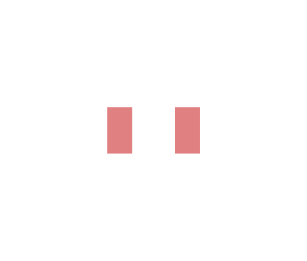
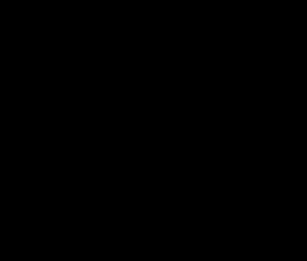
part: (153, 130) -> none

